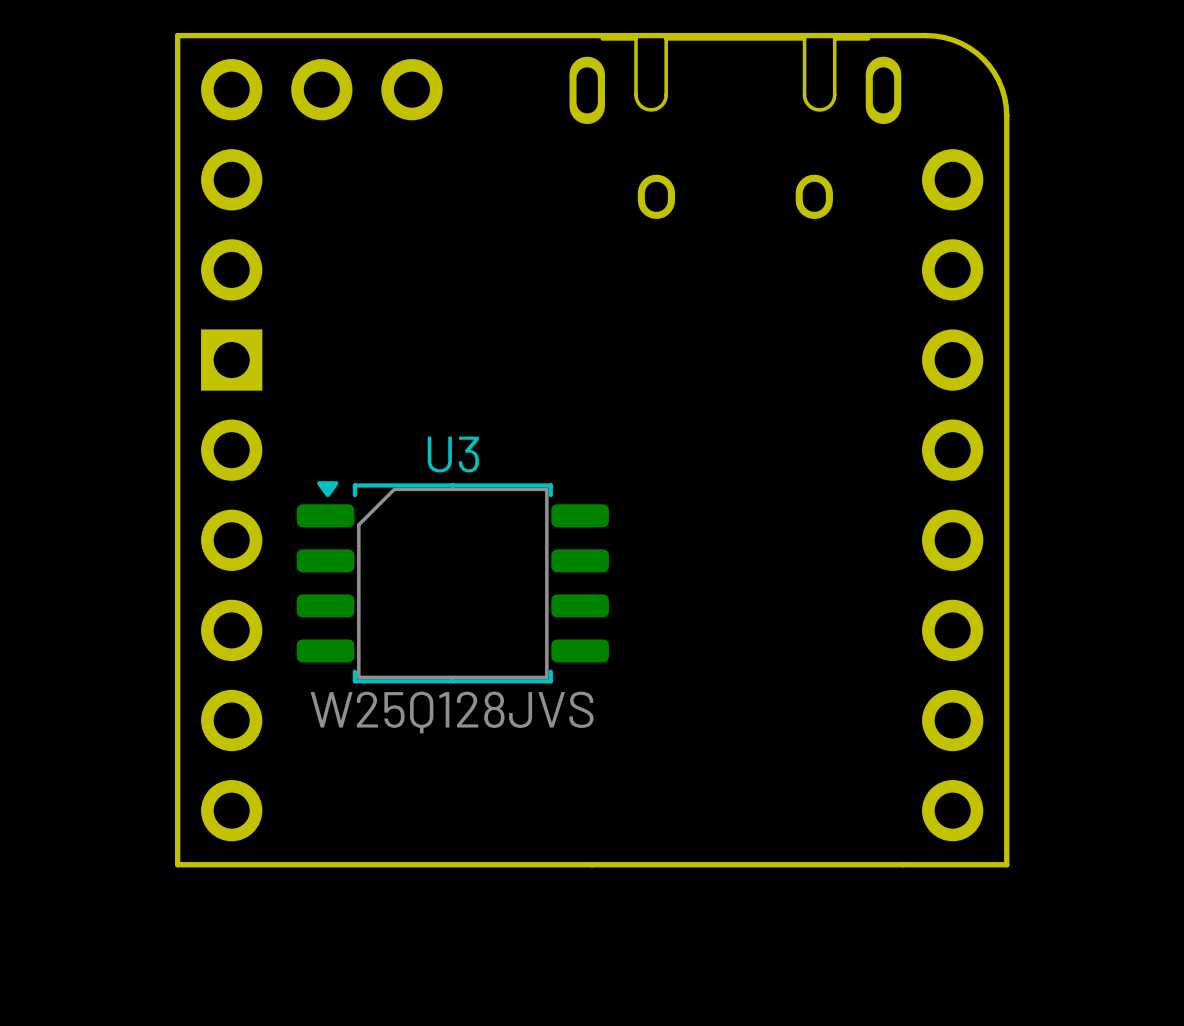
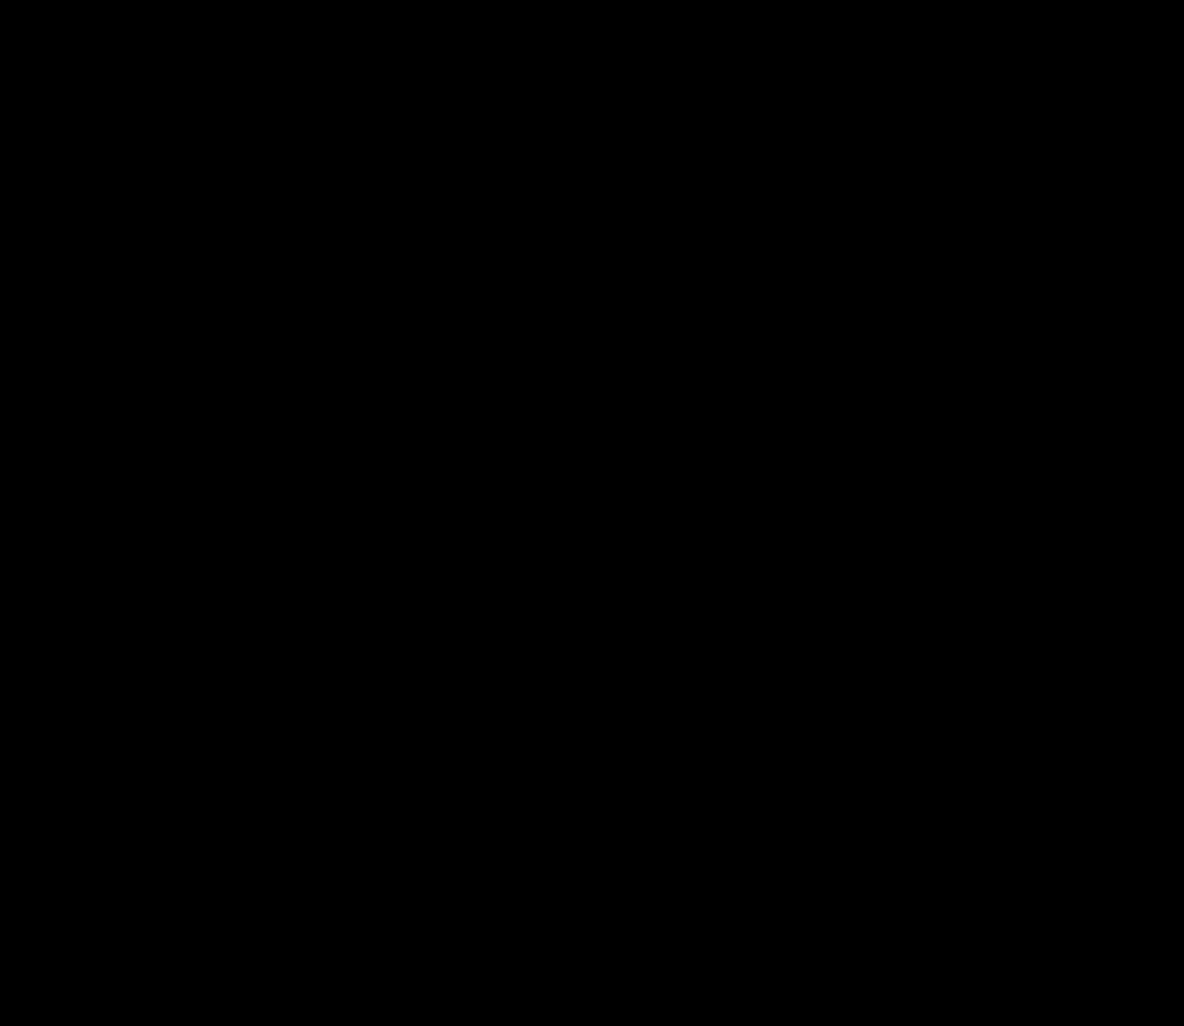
part: (735, 128) -> none
part: (592, 450) -> none
U3: W25Q128JVS (452, 582) -> none

